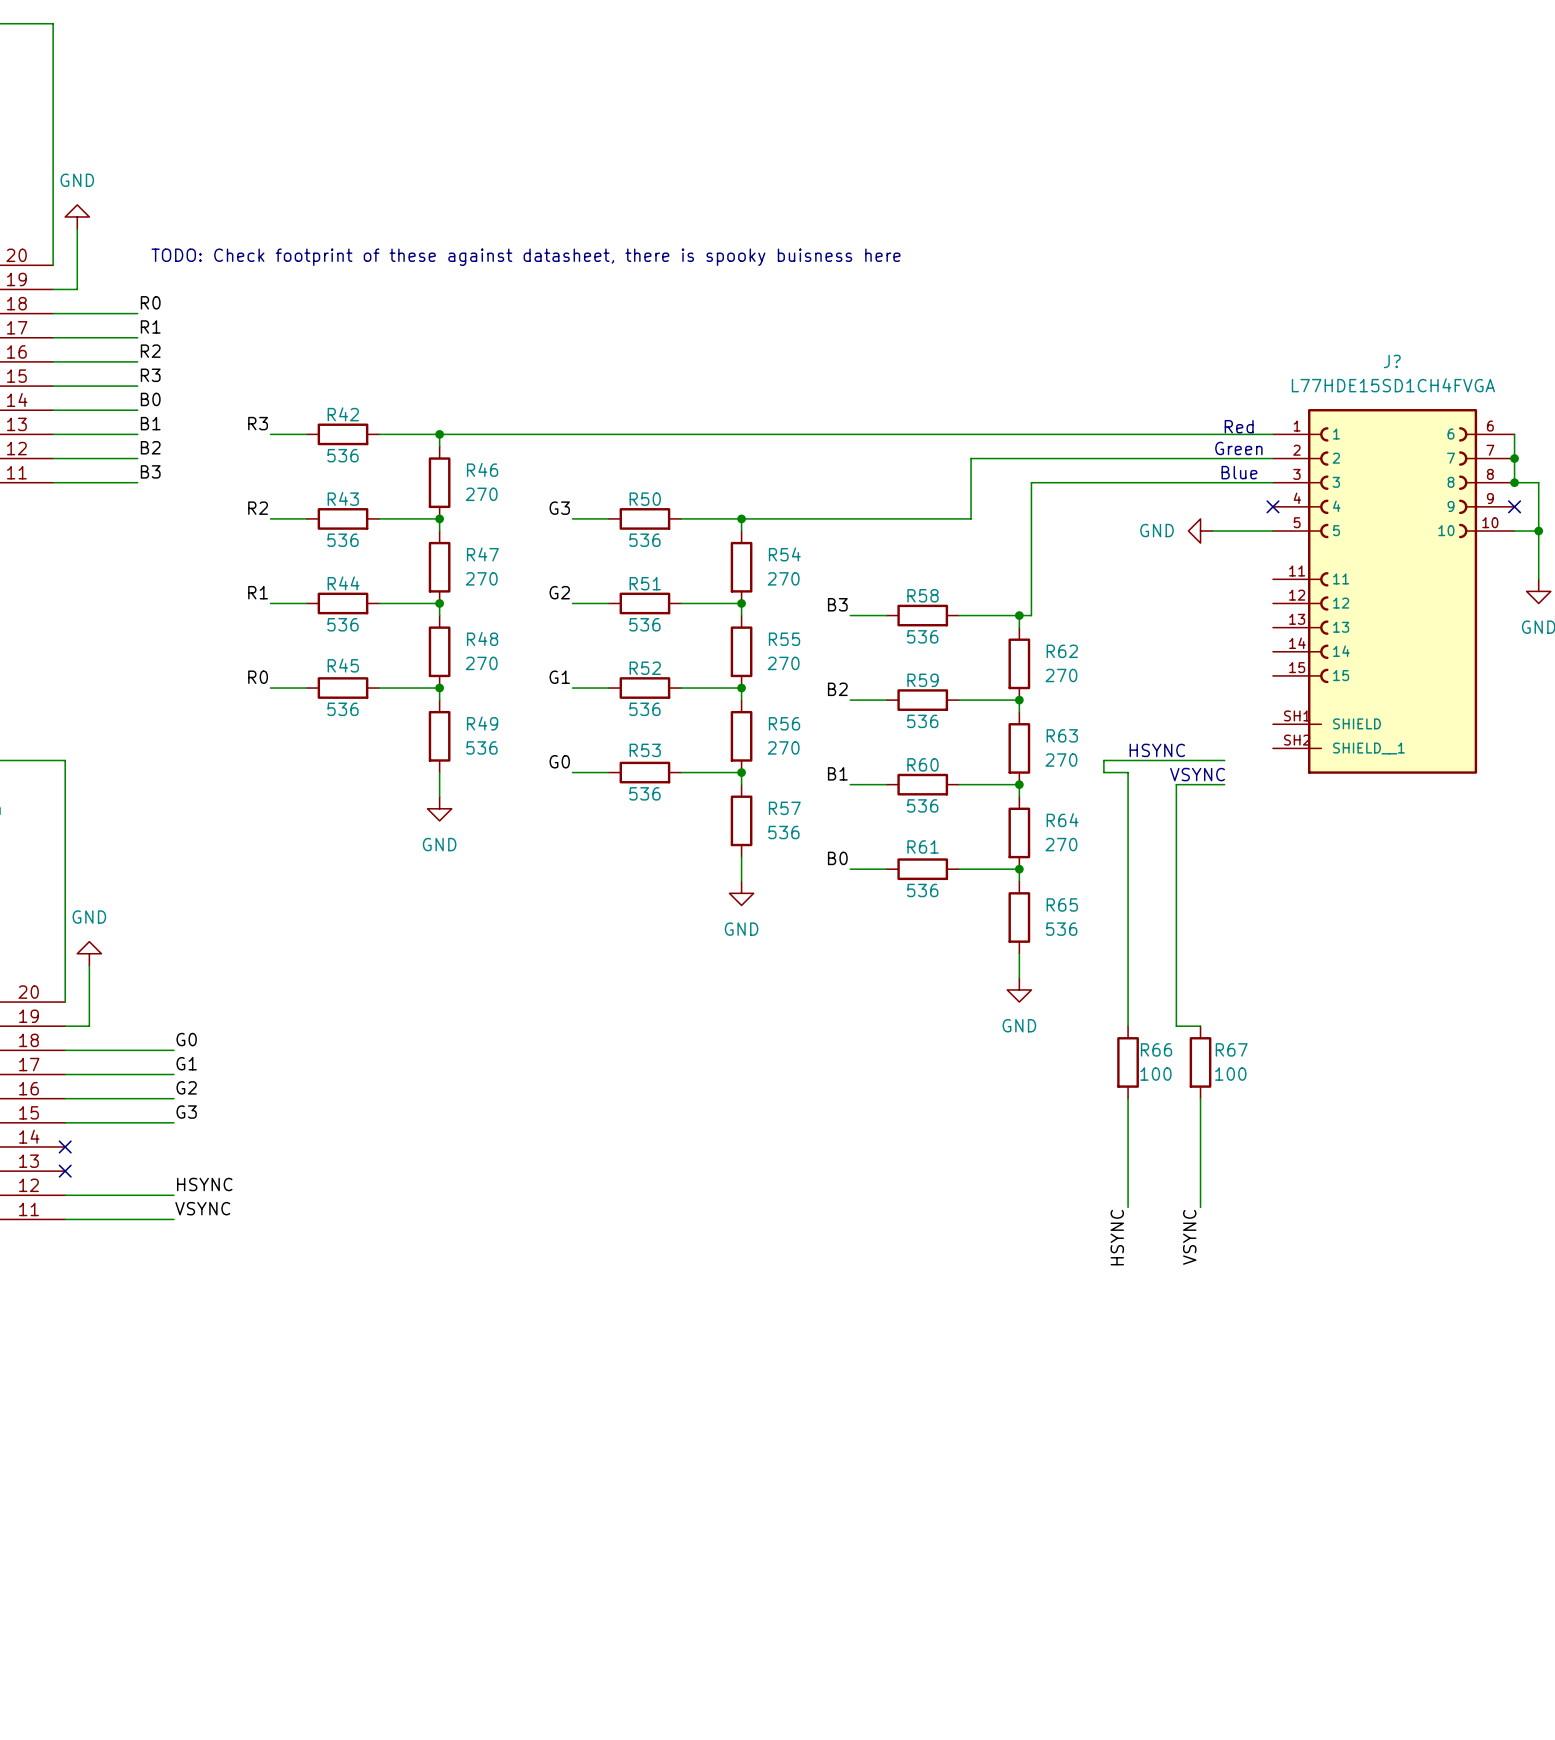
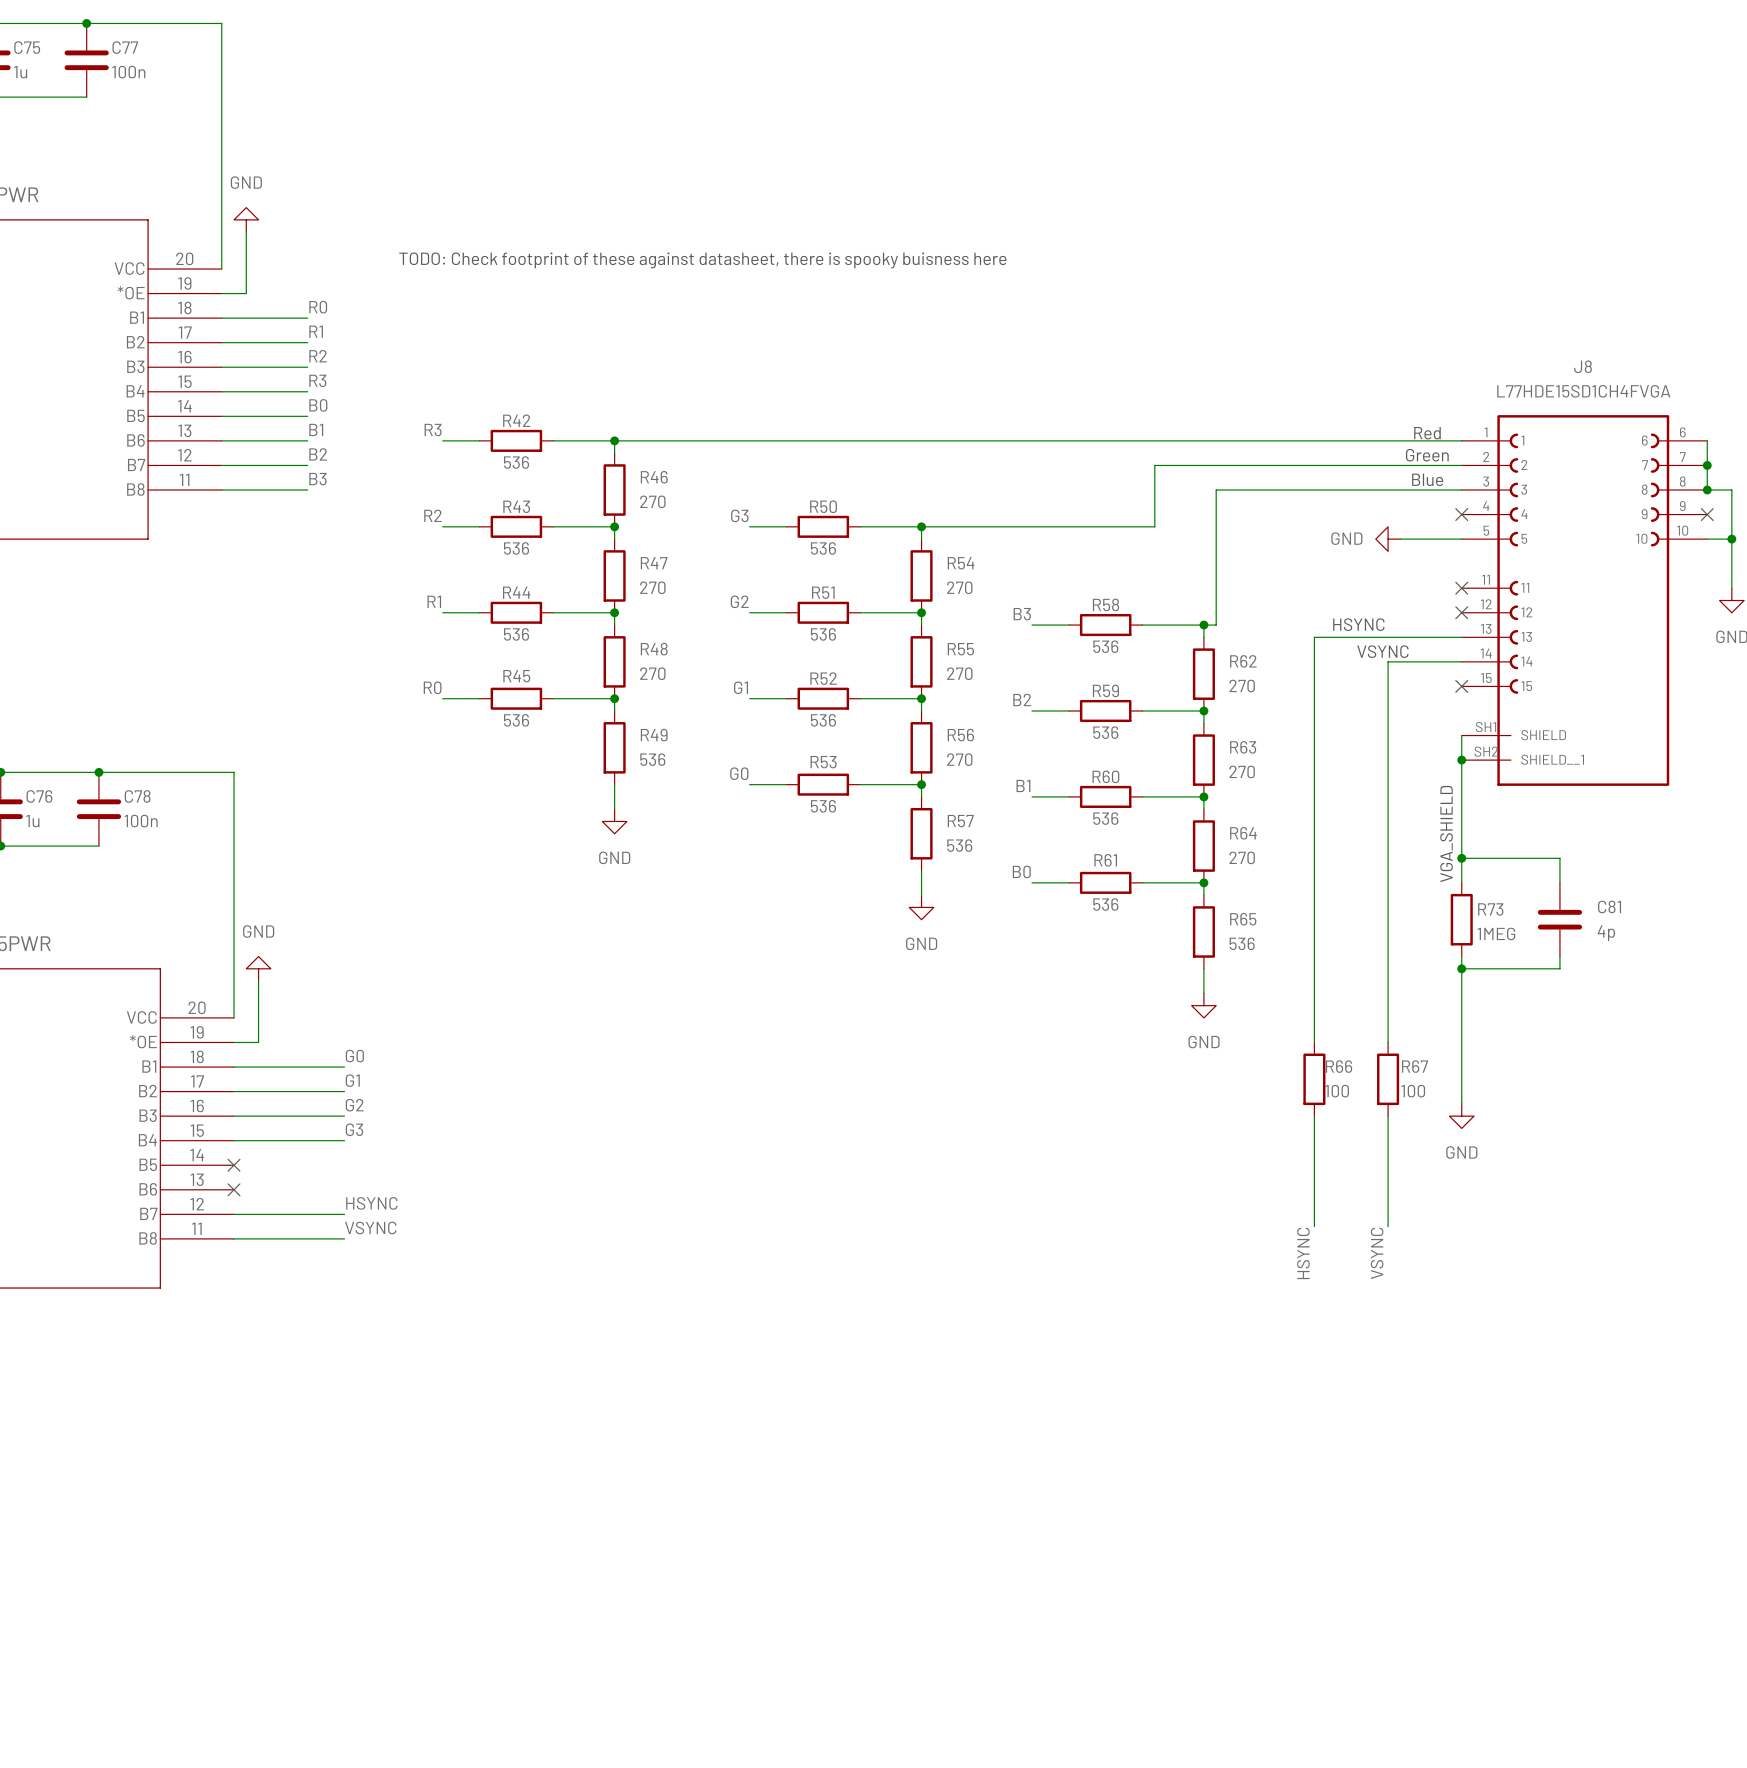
J? name: J? (1392, 361) -> J8 (1583, 366)
no-connect mark: none -> (1461, 588)
no-connect mark: none -> (1461, 612)
no-connect mark: none -> (1461, 686)
wire: none -> (1461, 735) (1461, 882)
junction: none -> (1461, 760)
text position: HSYNC (1157, 750) -> HSYNC (1358, 624)
wire: (1224, 760) (1103, 760) (1103, 772) (1128, 772) -> (1461, 637) (1314, 637) (1314, 784)
text position: VSYNC (1197, 774) -> VSYNC (1382, 651)
wire: (1224, 784) (1176, 784) (1176, 1026) (1200, 1026) -> (1461, 661) (1388, 661) (1388, 1042)
text: none -> VGA_SHIELD (1446, 834)
wire: none -> (1461, 858) (1559, 858) (1559, 882)
junction: none -> (1461, 858)
R73: none -> 1MEG (1461, 919)
C81: none -> 4p (1559, 919)
wire: none -> (1461, 956) (1461, 1103)
wire: none -> (1559, 956) (1559, 968) (1461, 968)
junction: none -> (1461, 968)
power symbol: none -> GND (1461, 1116)

